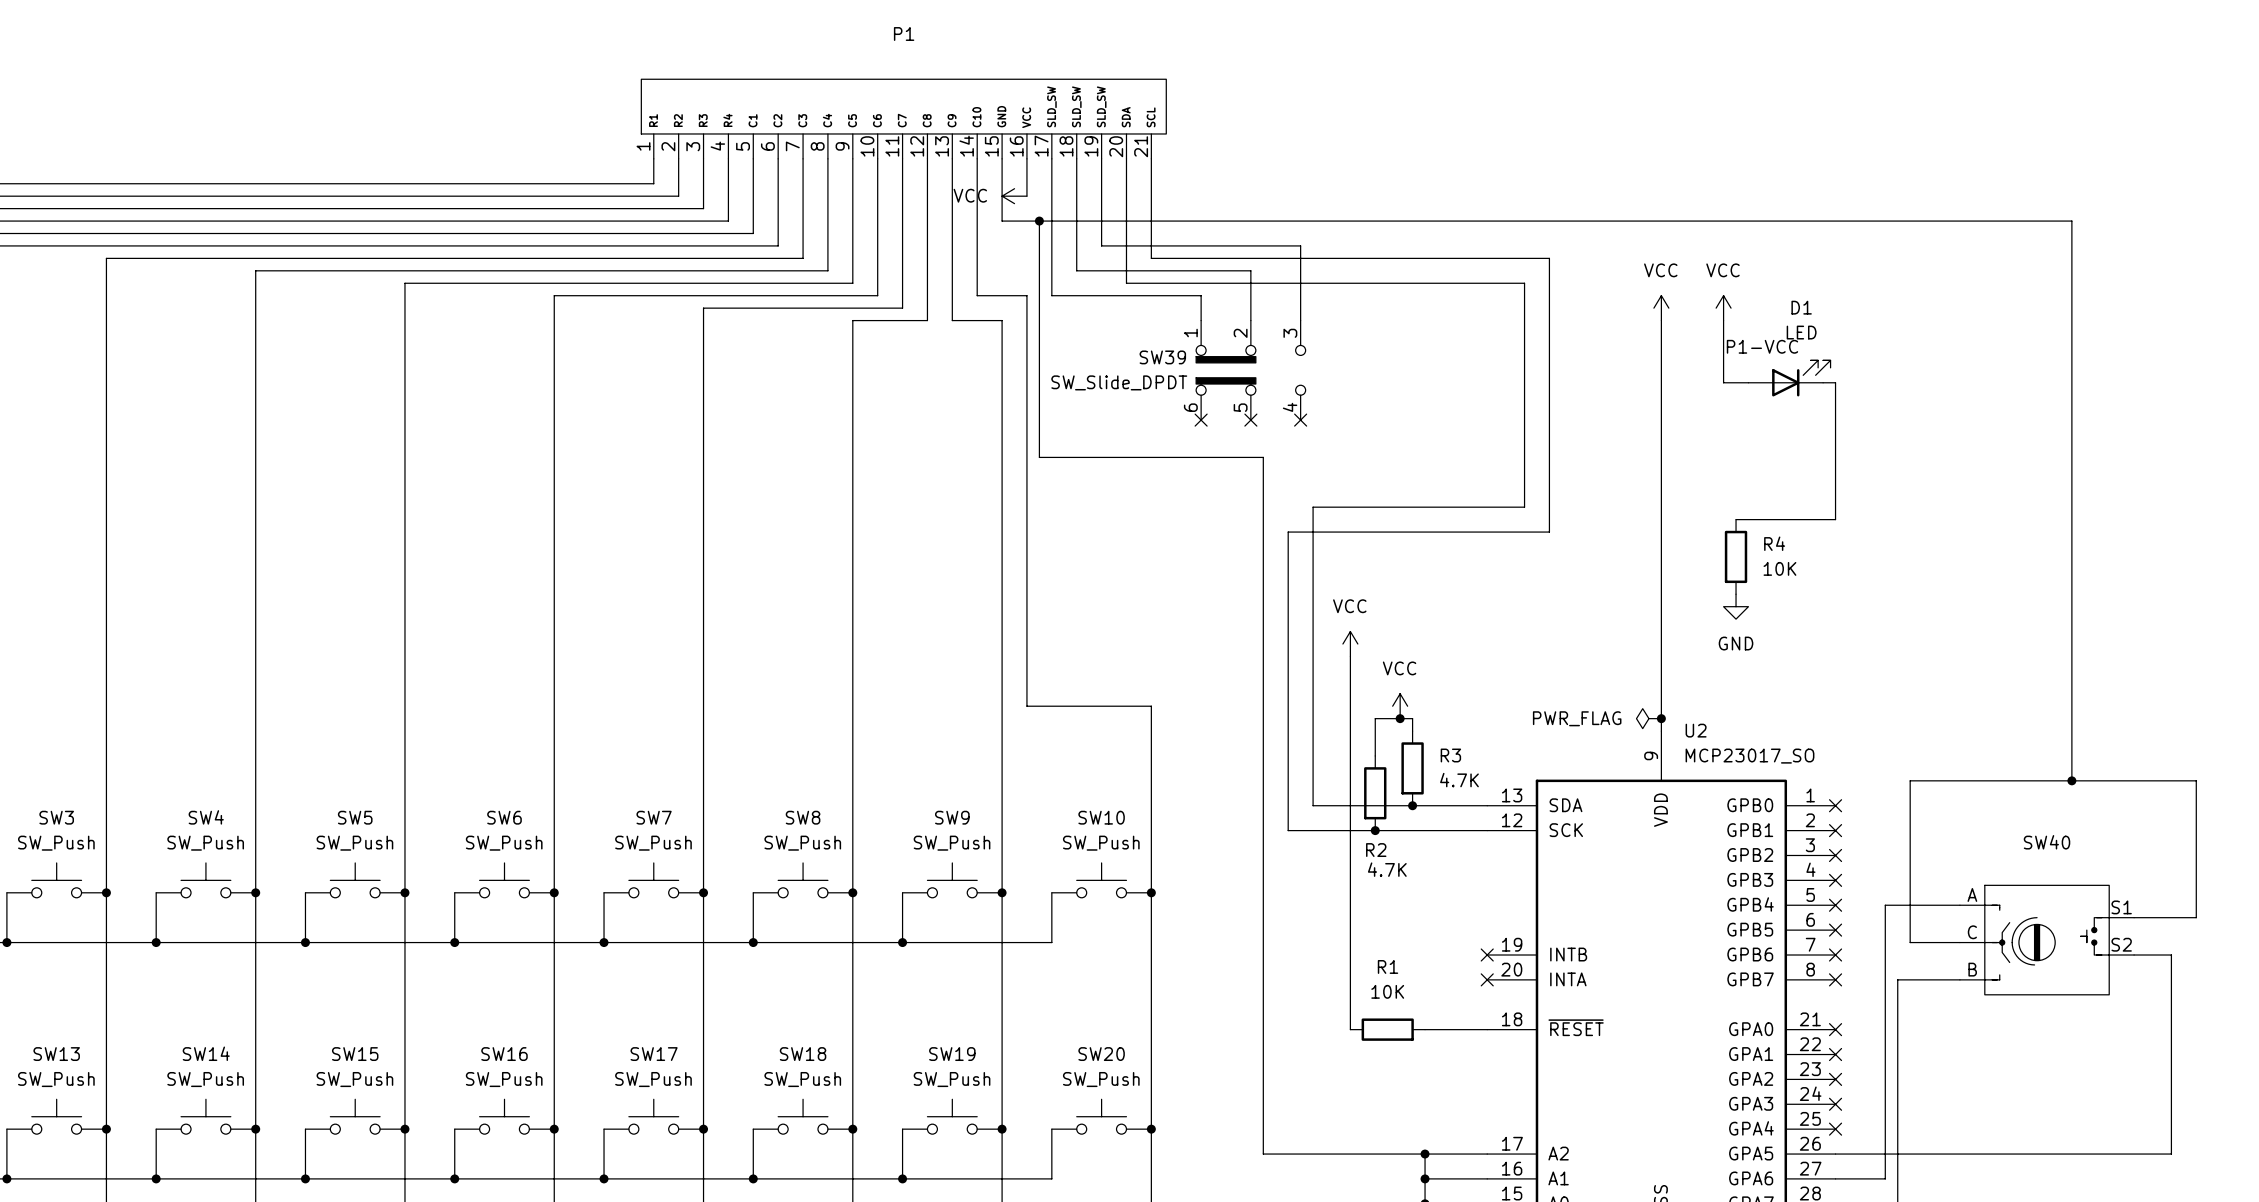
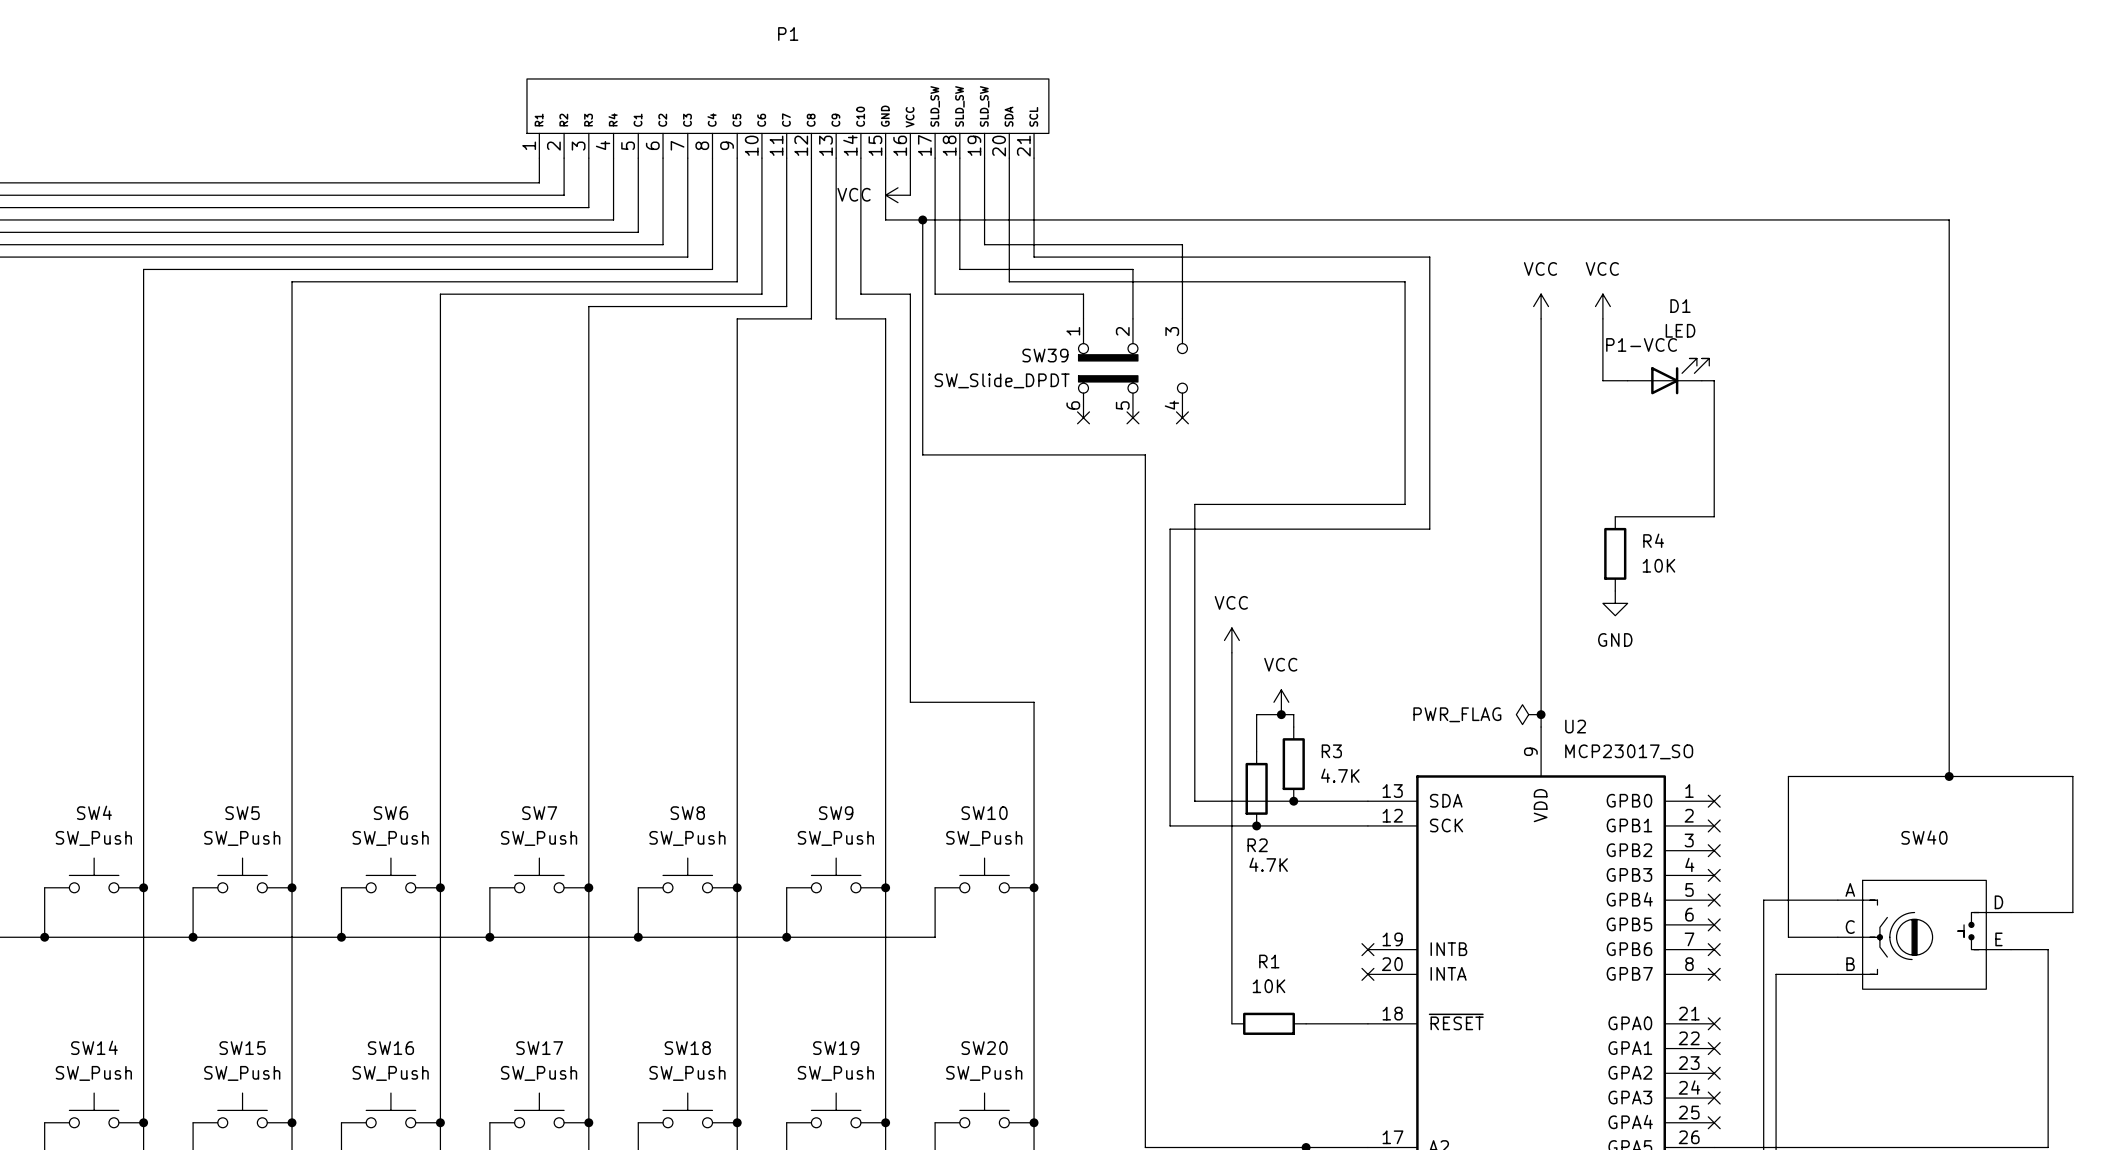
SW40 pin number: S1 (2121, 907) -> D (1998, 902)
SW40 pin number: S2 (2121, 944) -> E (1998, 939)

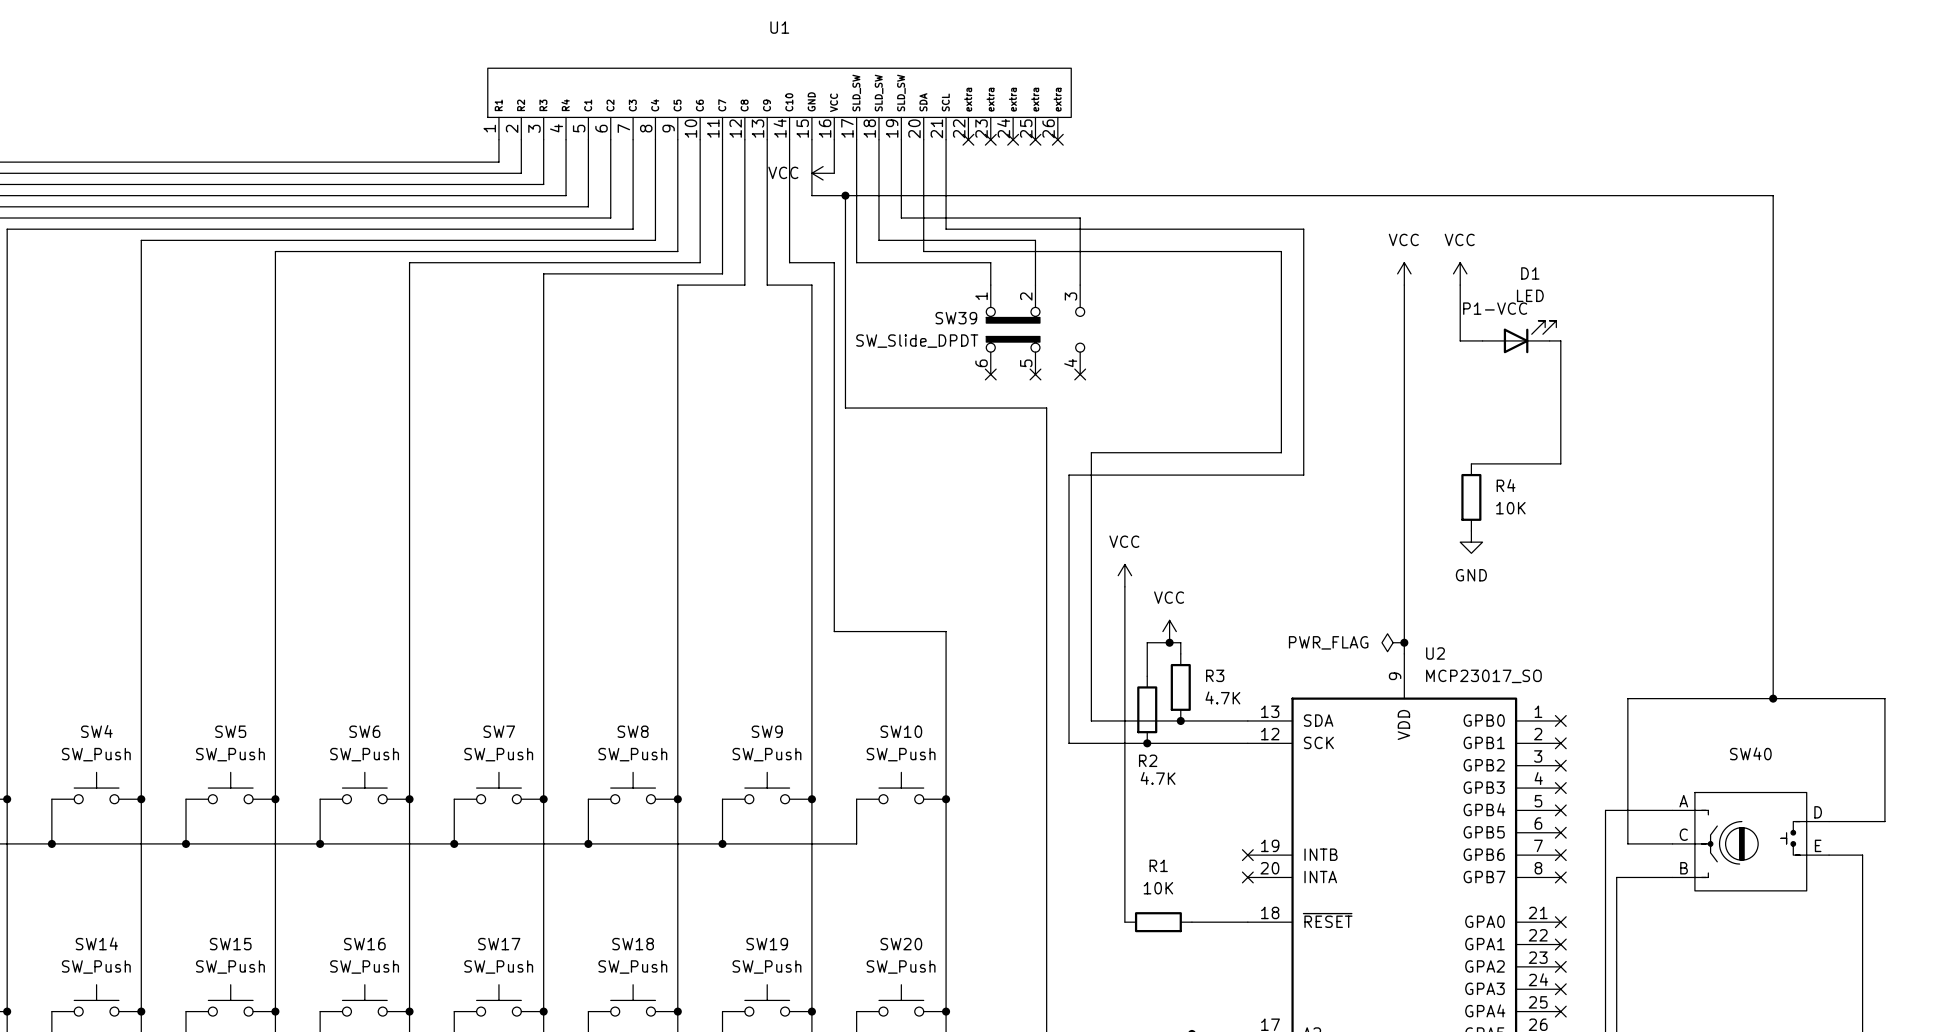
P1: (787, 118) -> none
U1: none -> (779, 103)
no-connect mark: none -> (968, 139)
no-connect mark: none -> (990, 139)
no-connect mark: none -> (1013, 139)
no-connect mark: none -> (1035, 139)
no-connect mark: none -> (1057, 139)

